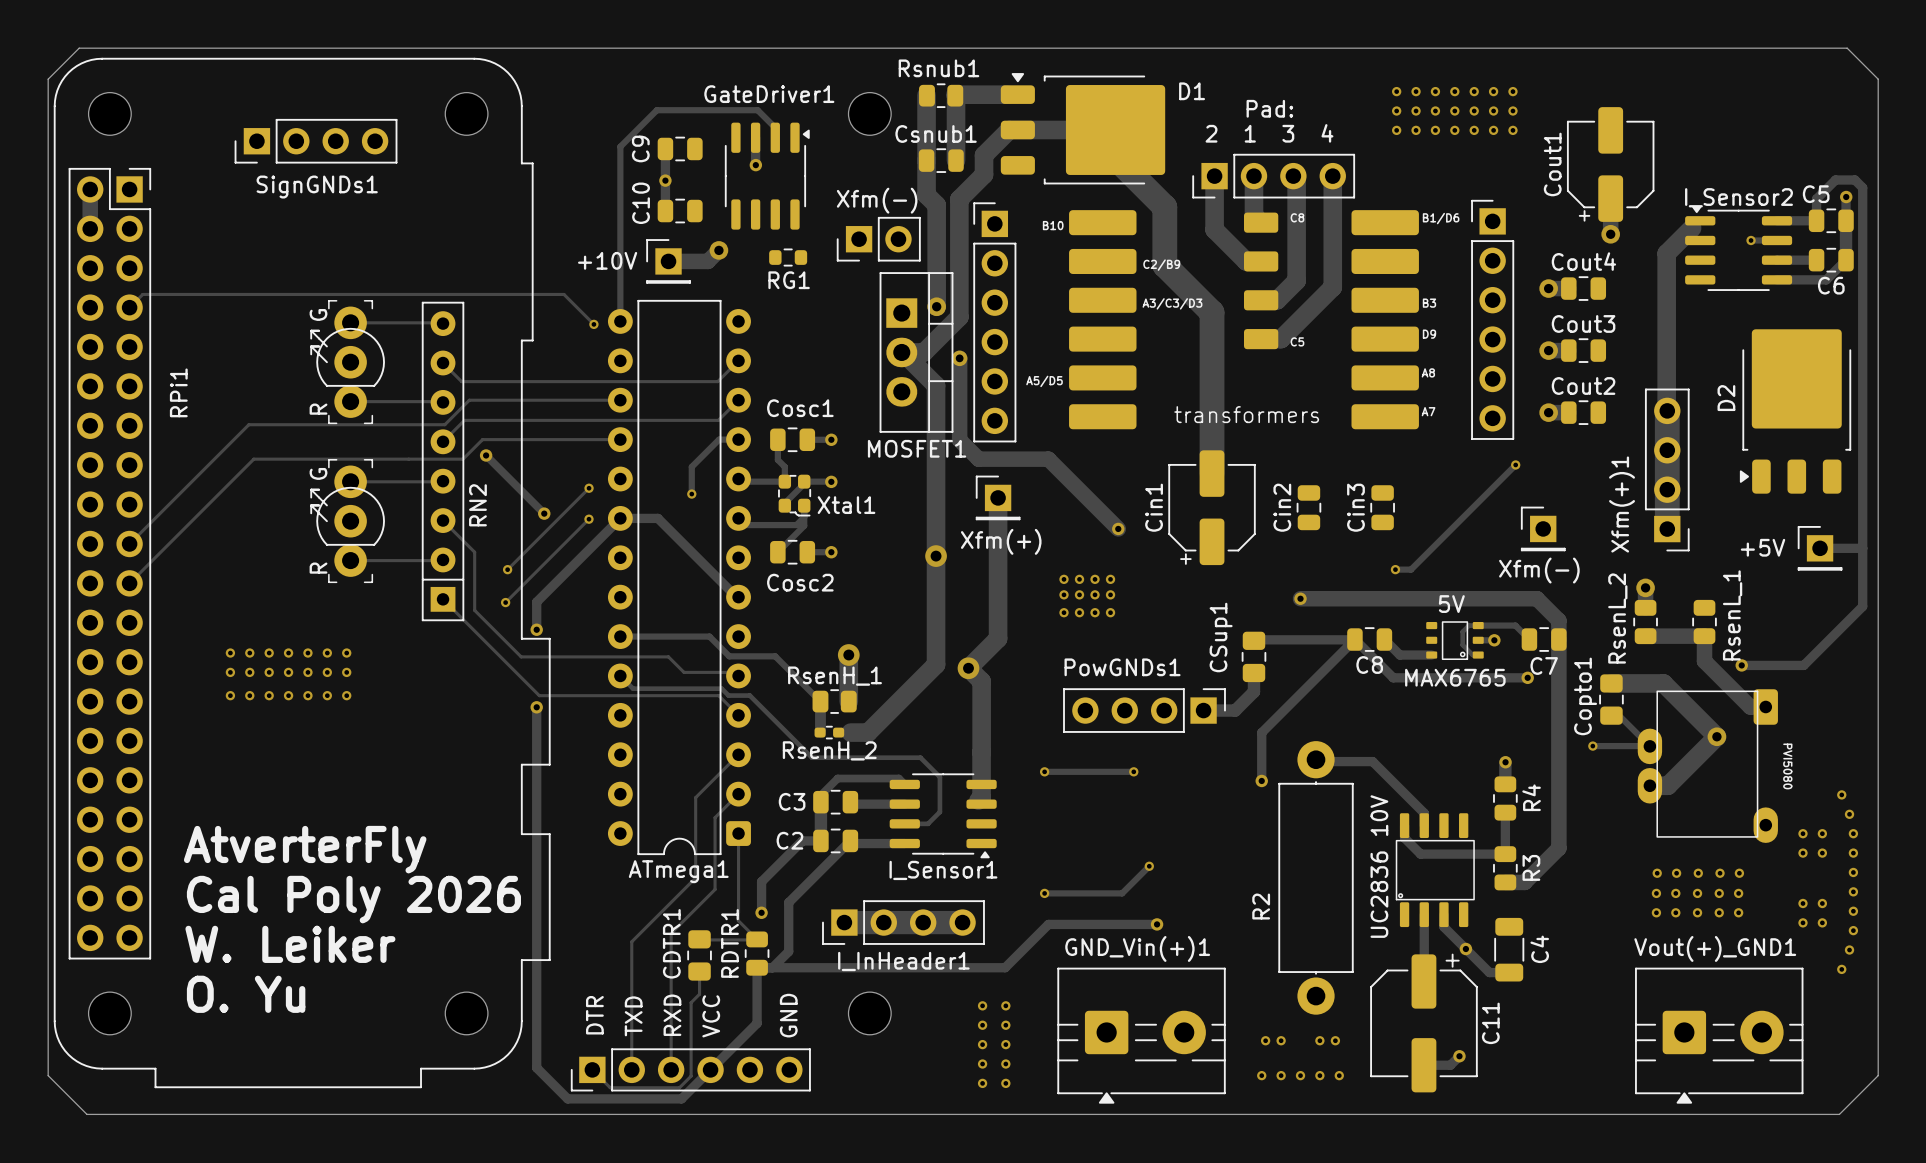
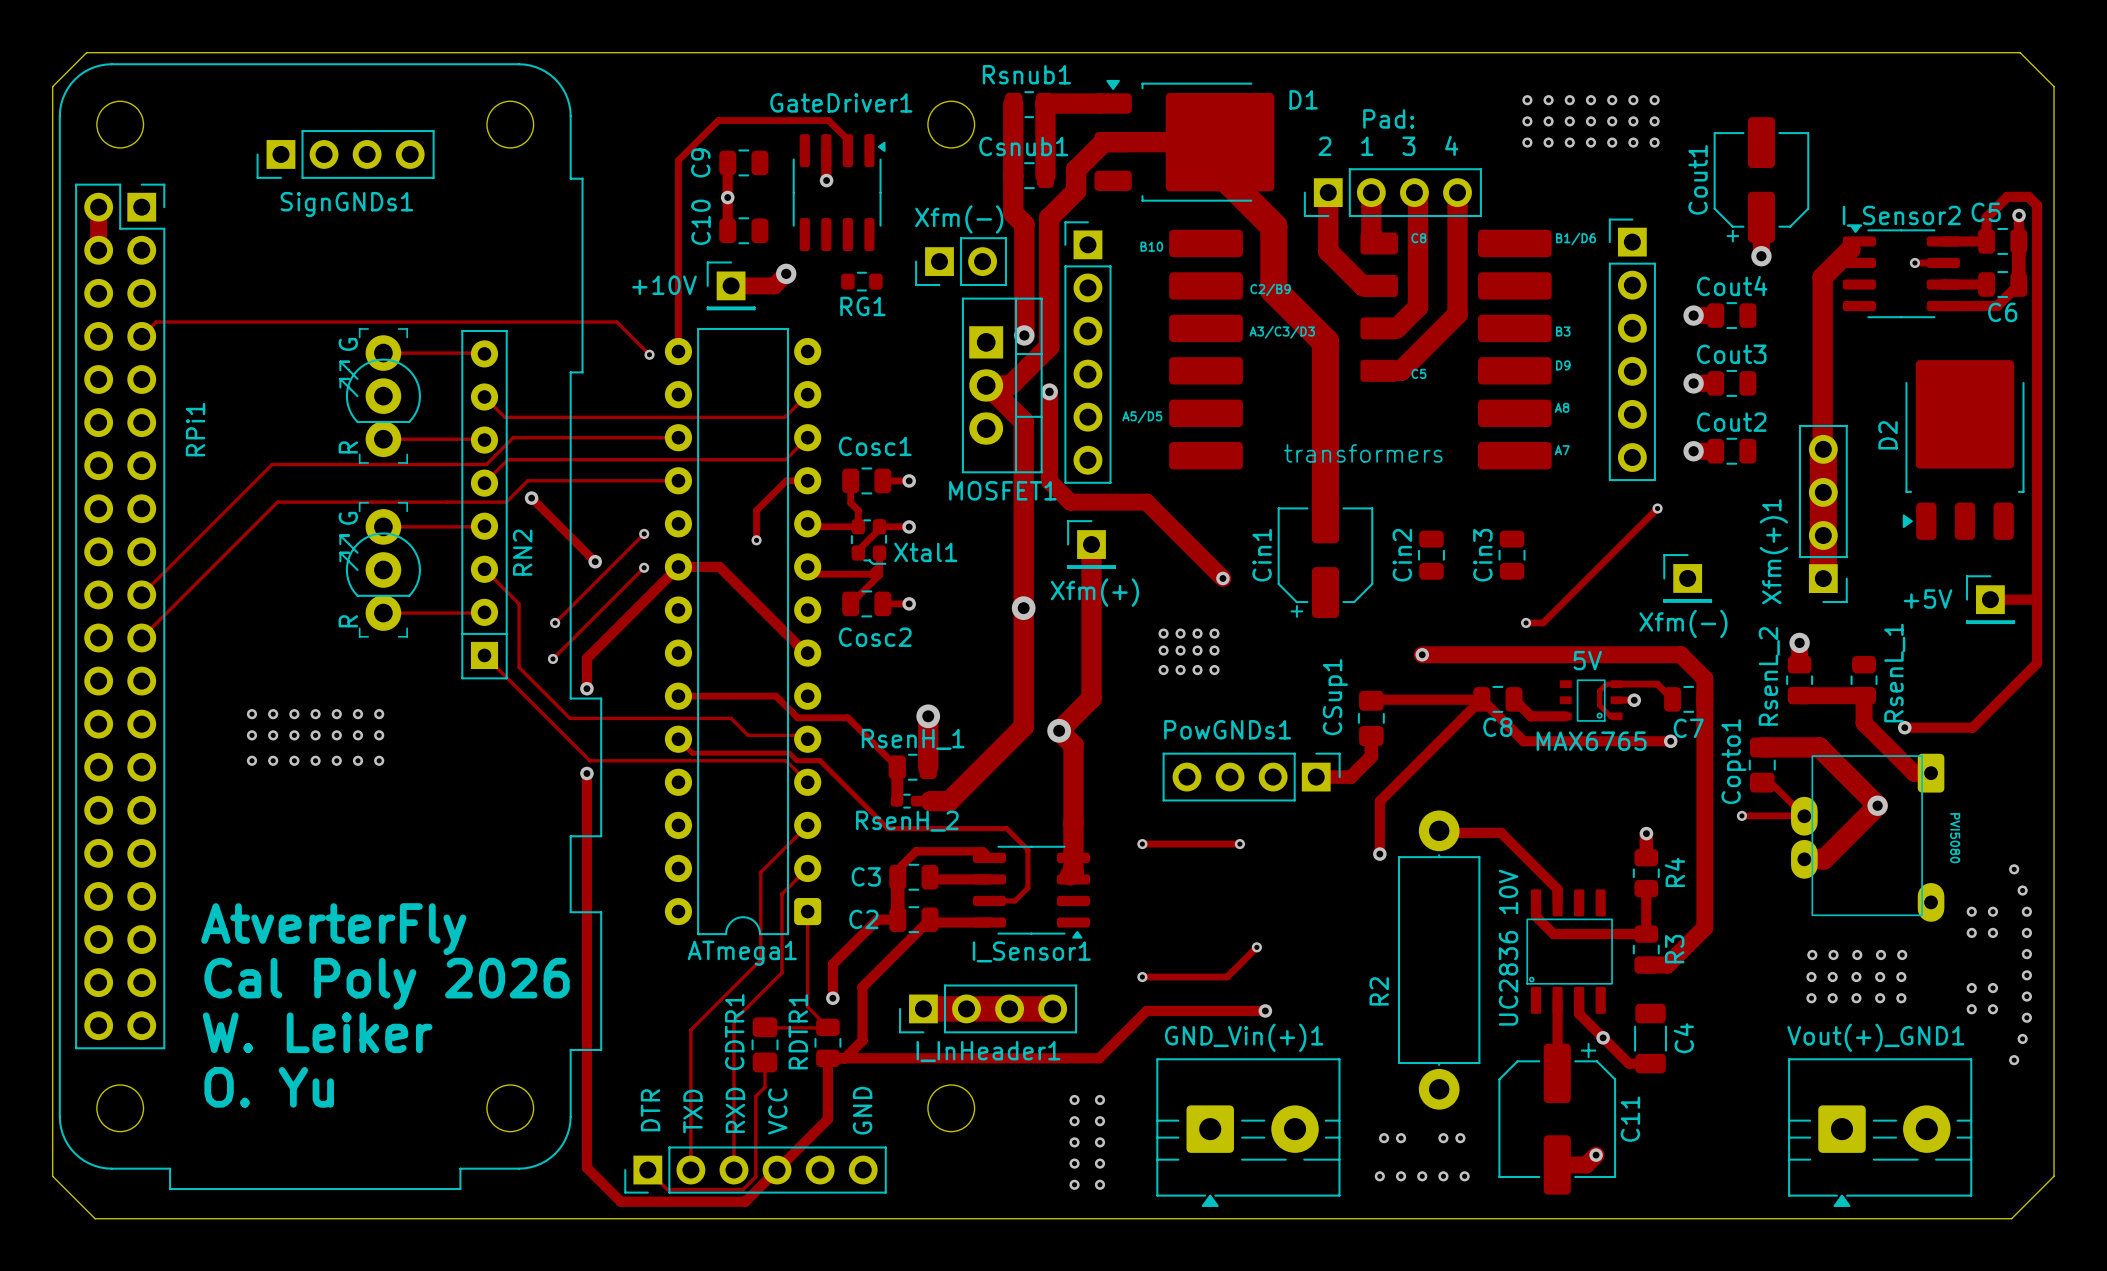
track width: thin (1459, 1056) (1450, 1065) (1423, 1065) -> thick (1596, 1155) (1586, 1164) (1557, 1164)

